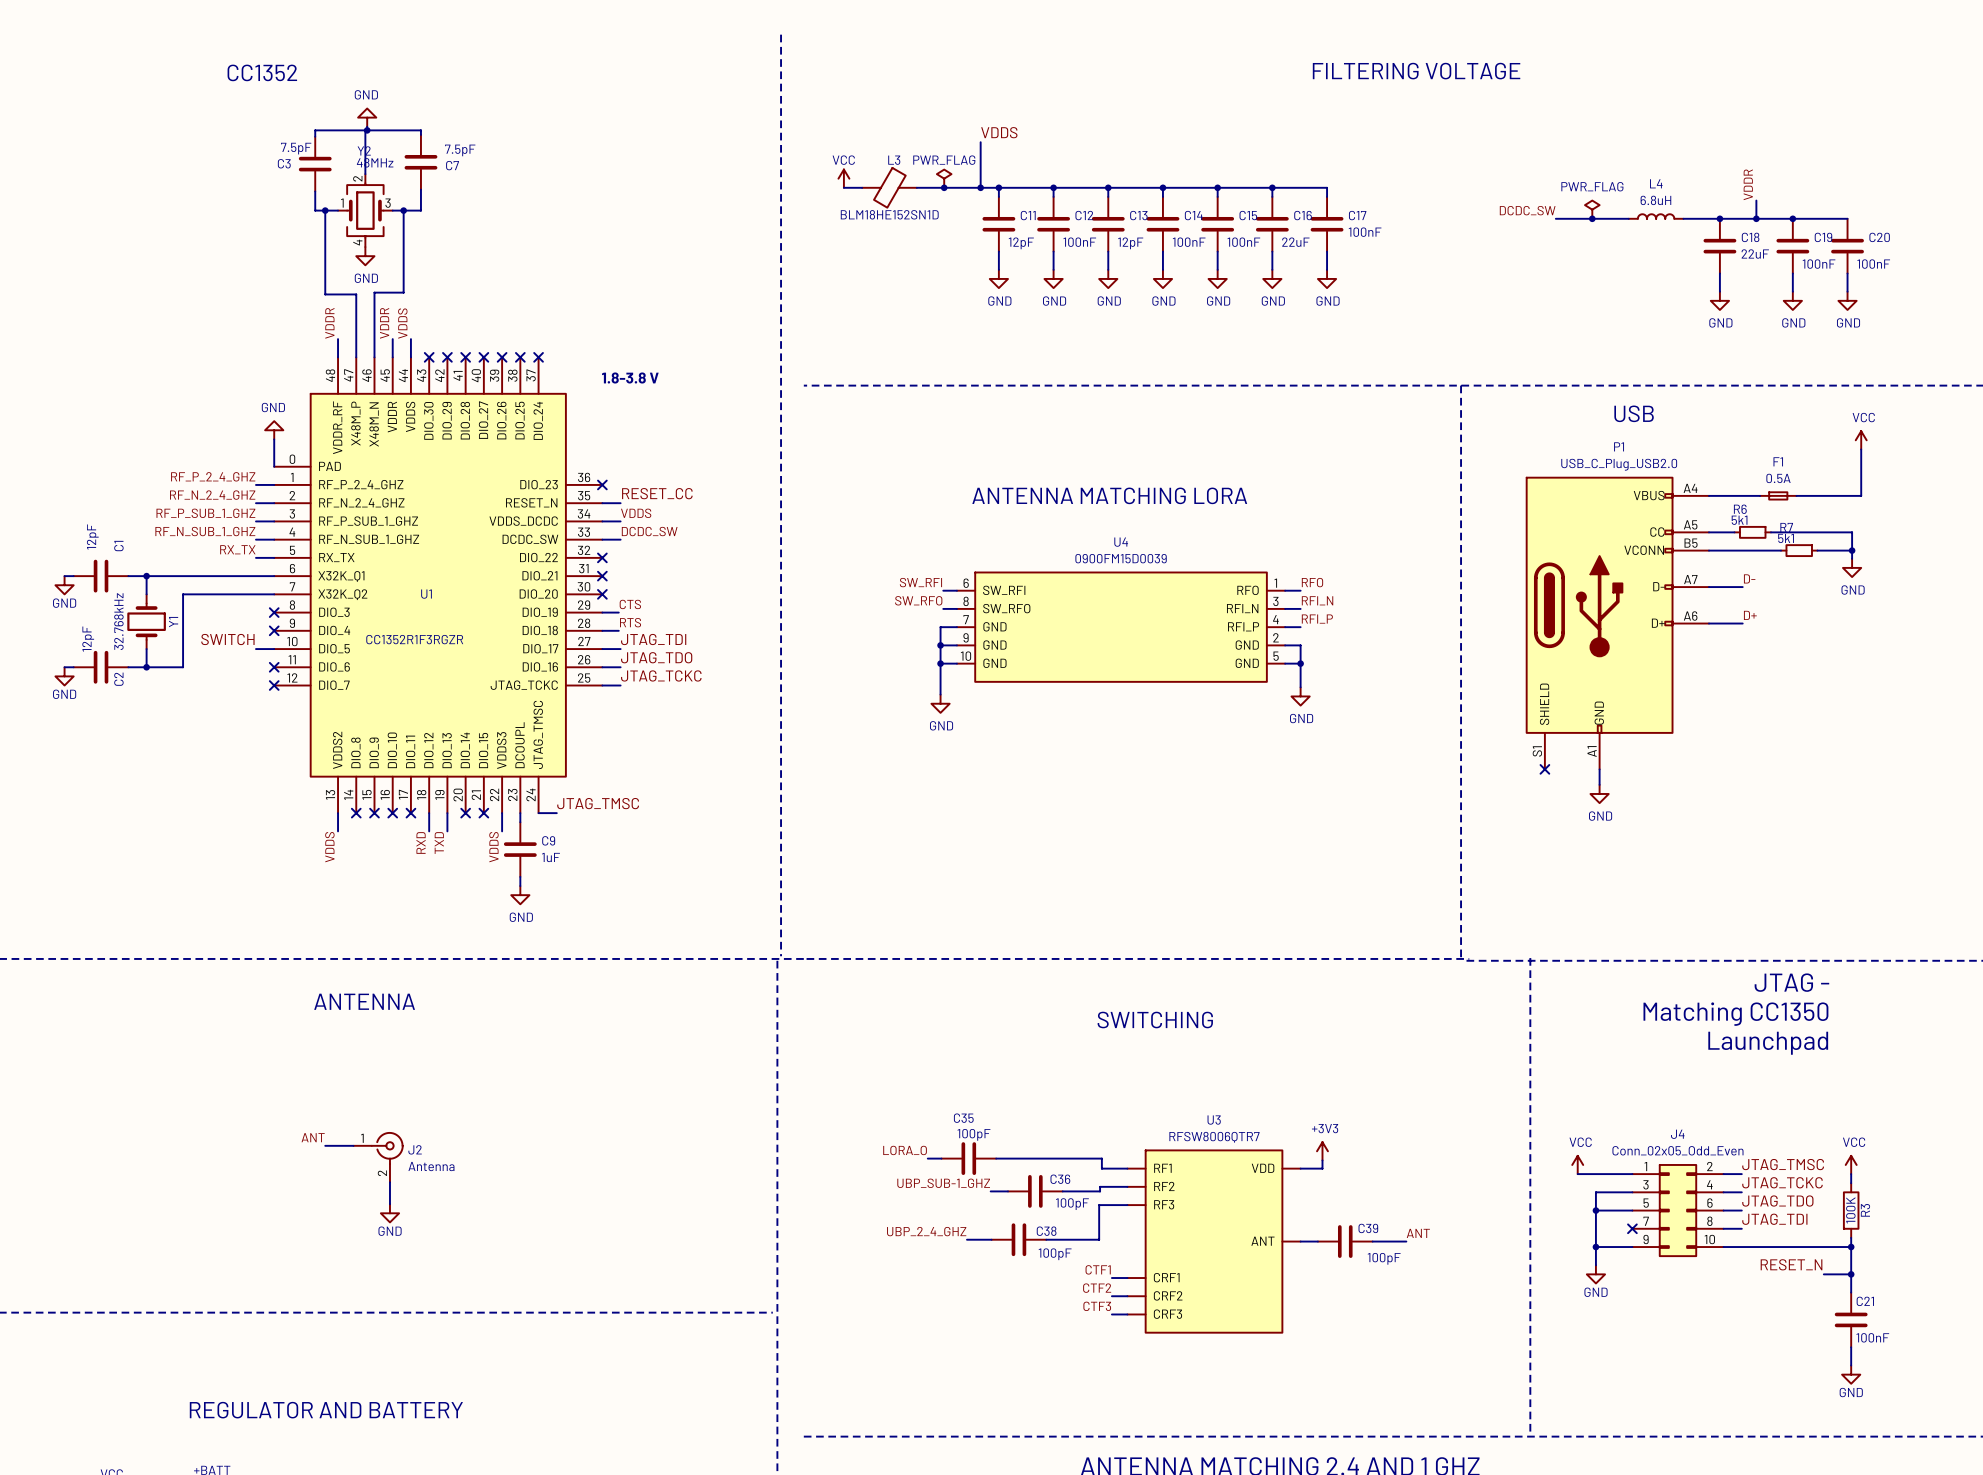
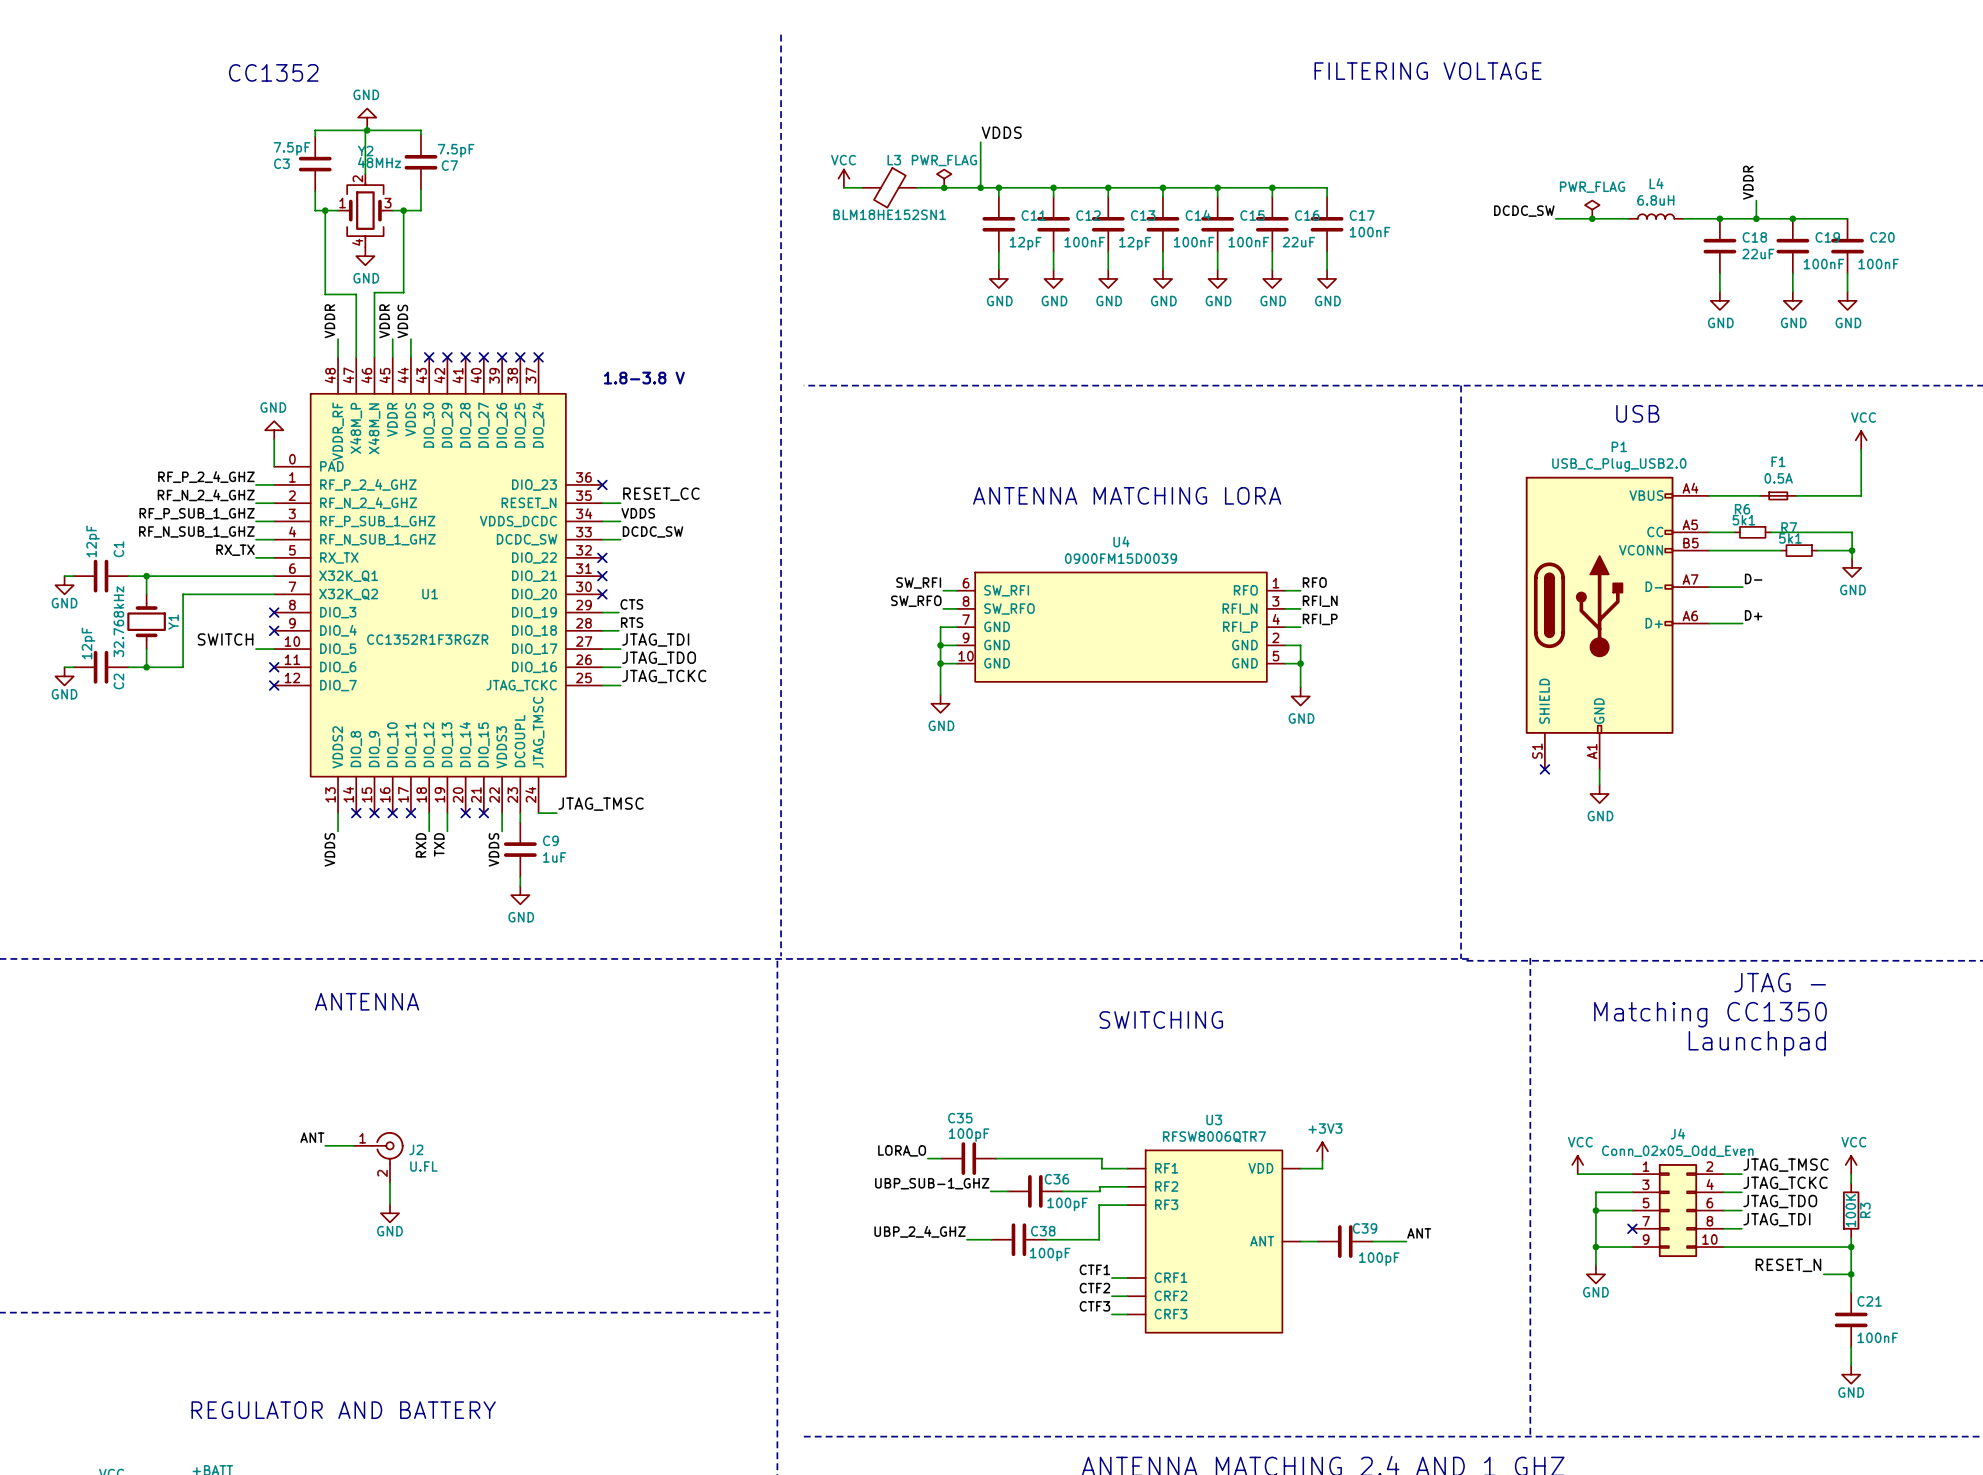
L3 value: BLM18HE152SN1D (889, 214) -> BLM18HE152SN1 (889, 214)
J2 value: Antenna (431, 1166) -> U.FL (423, 1166)

